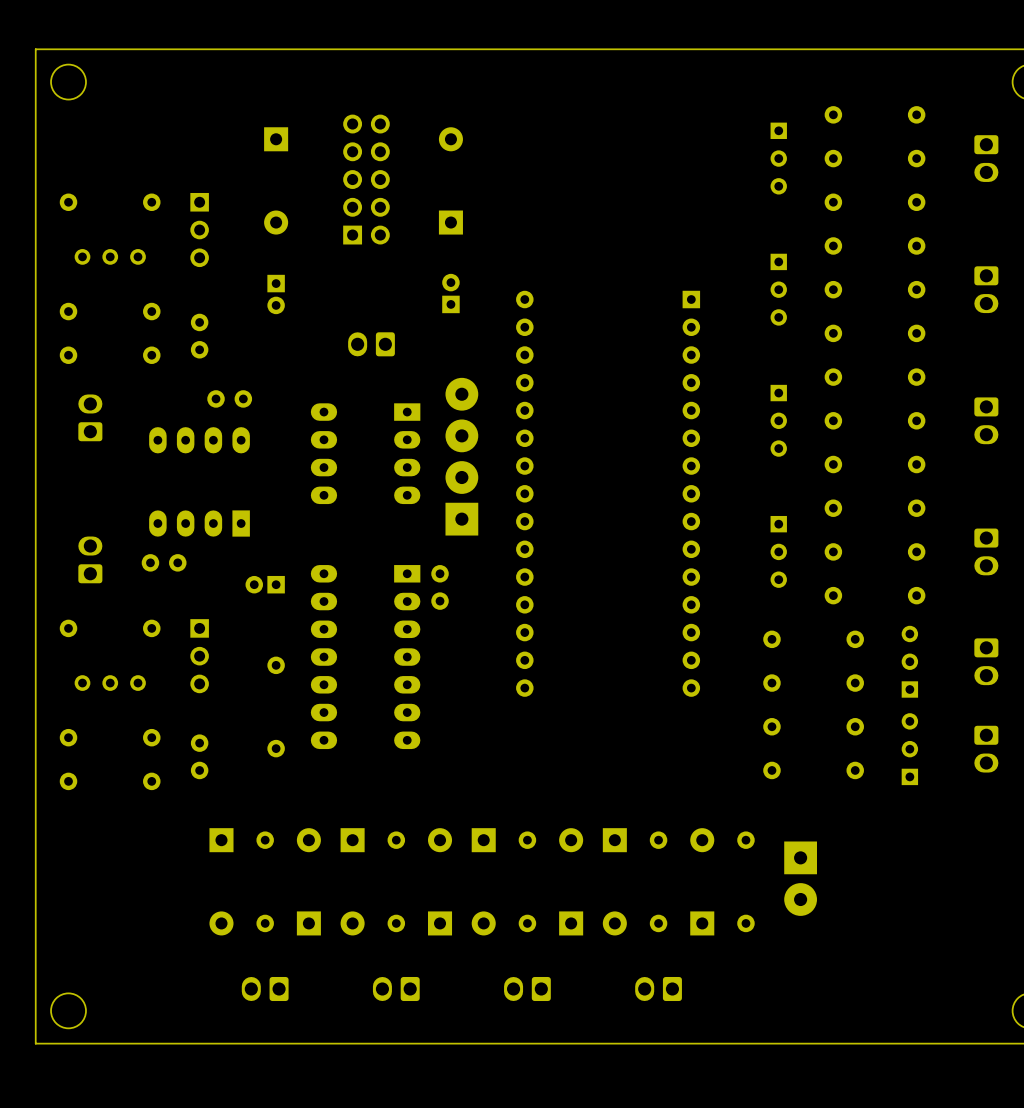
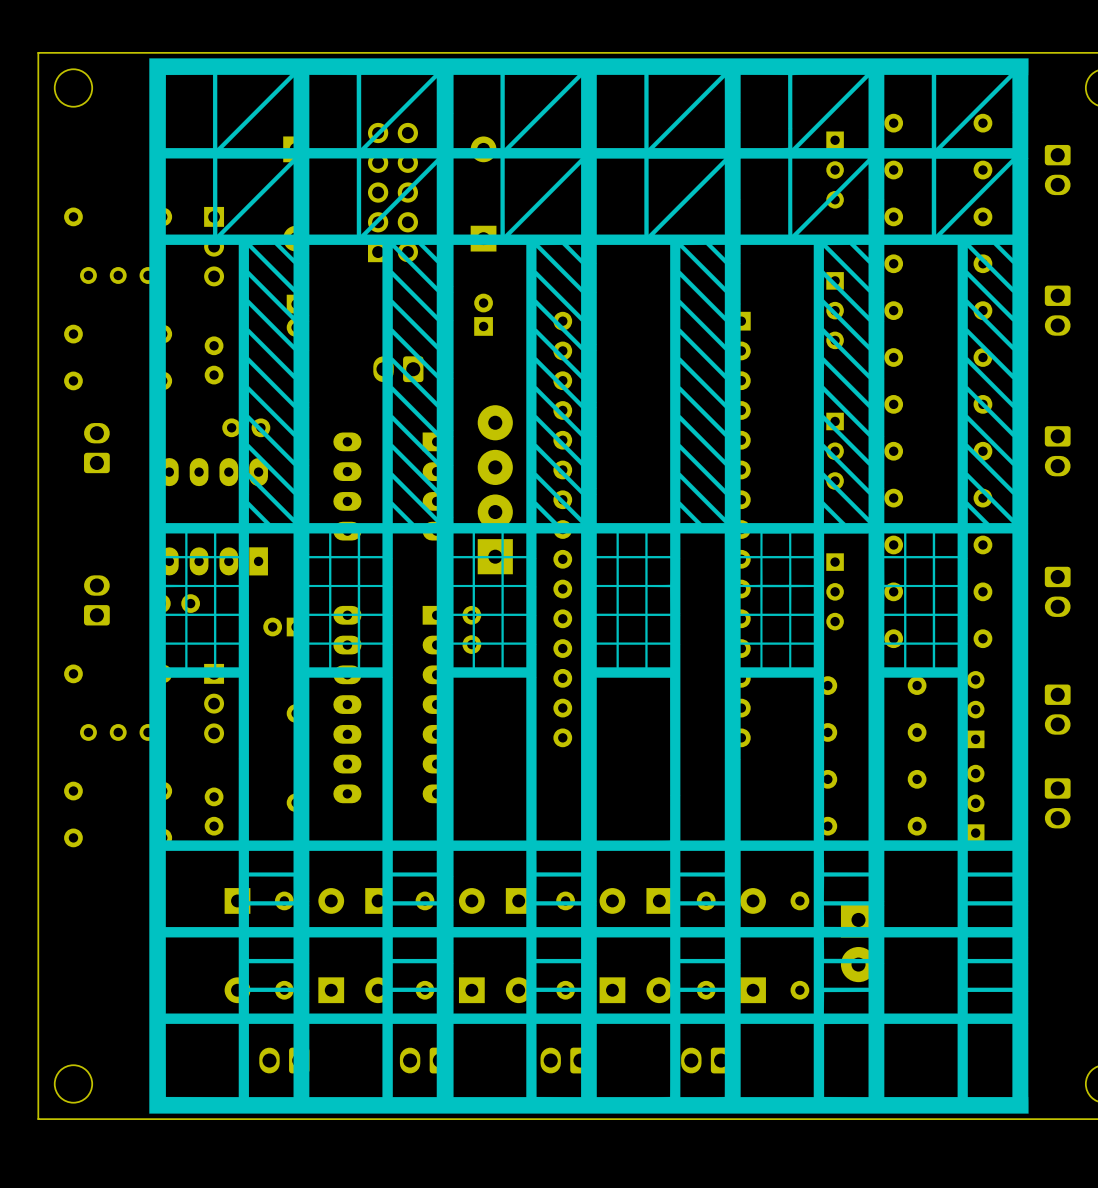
drawing: none -> [149, 58, 1029, 1114]

